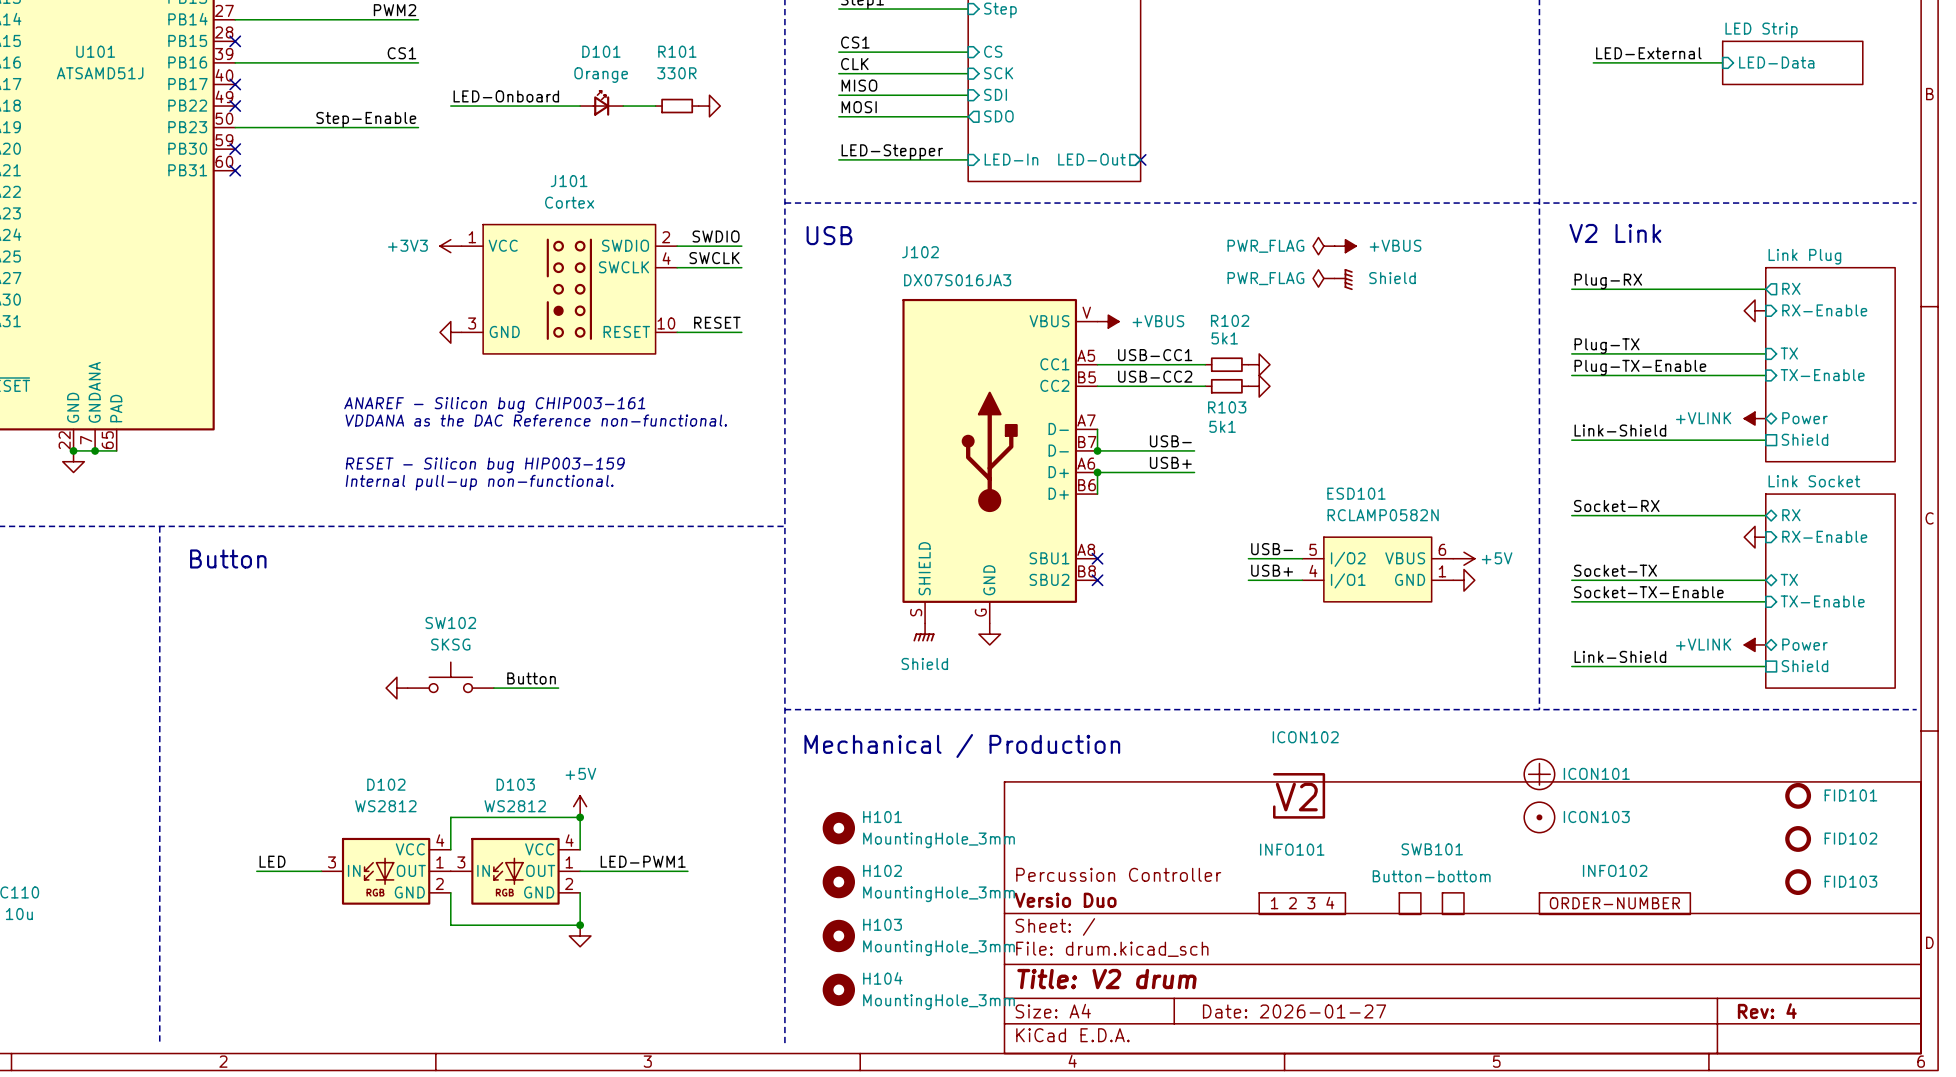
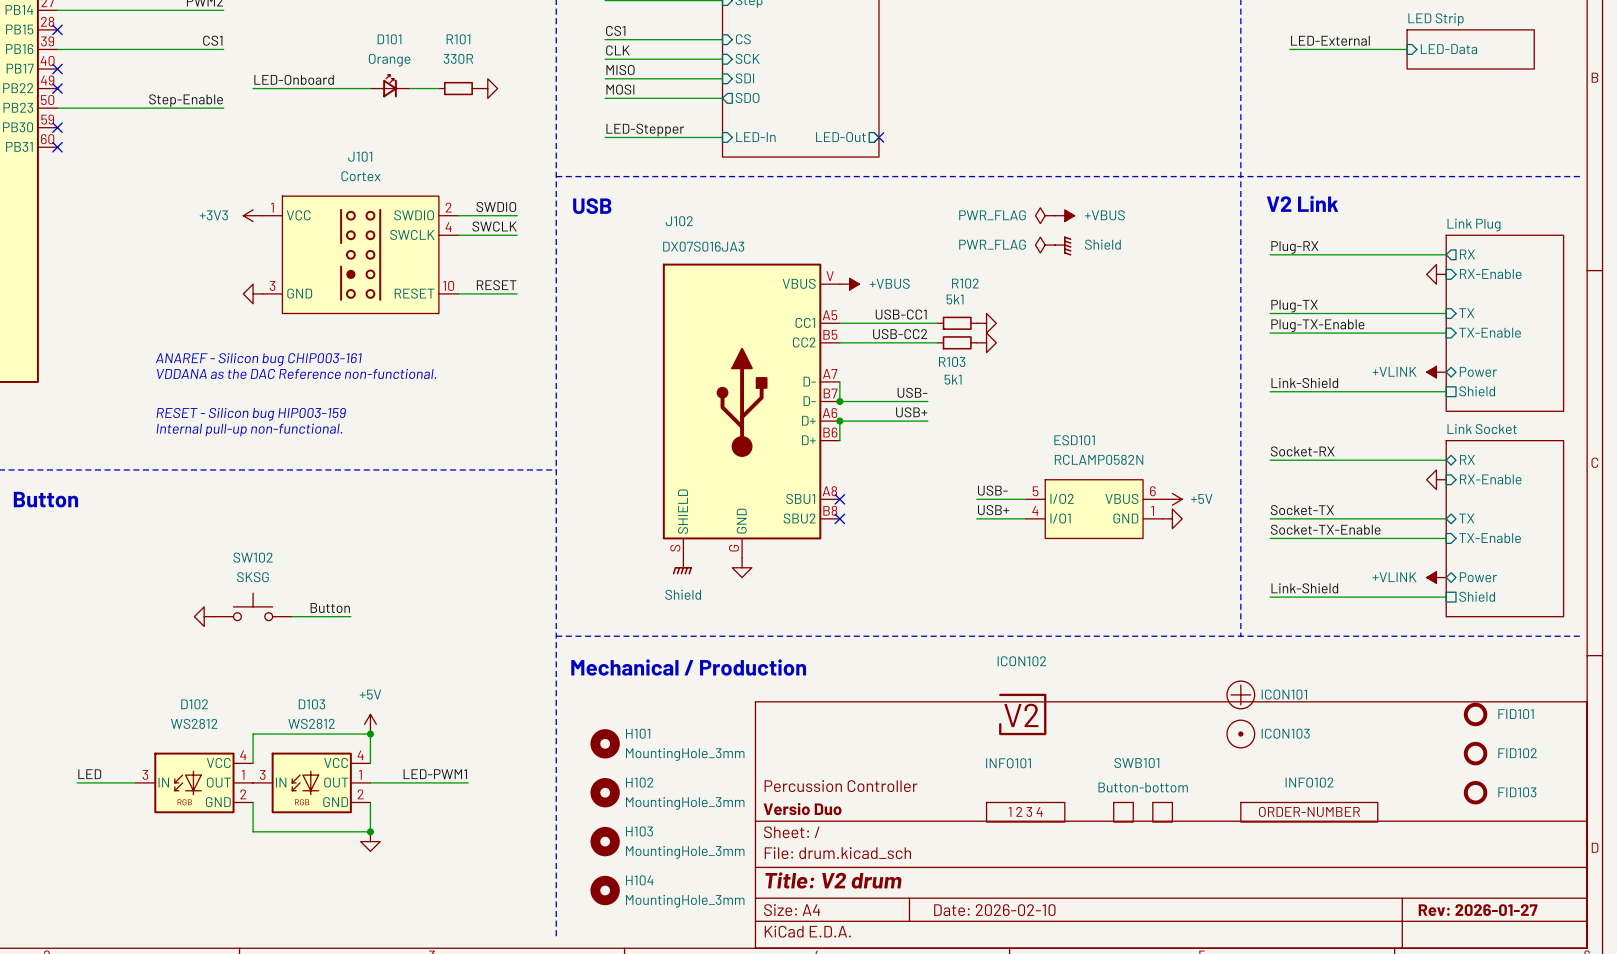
title block: Date: 2026-01-27 (1294, 1011) -> Date: 2026-02-10 (994, 910)
title block: Rev: 4 (1767, 1011) -> Rev: 2026-01-27 (1478, 910)

